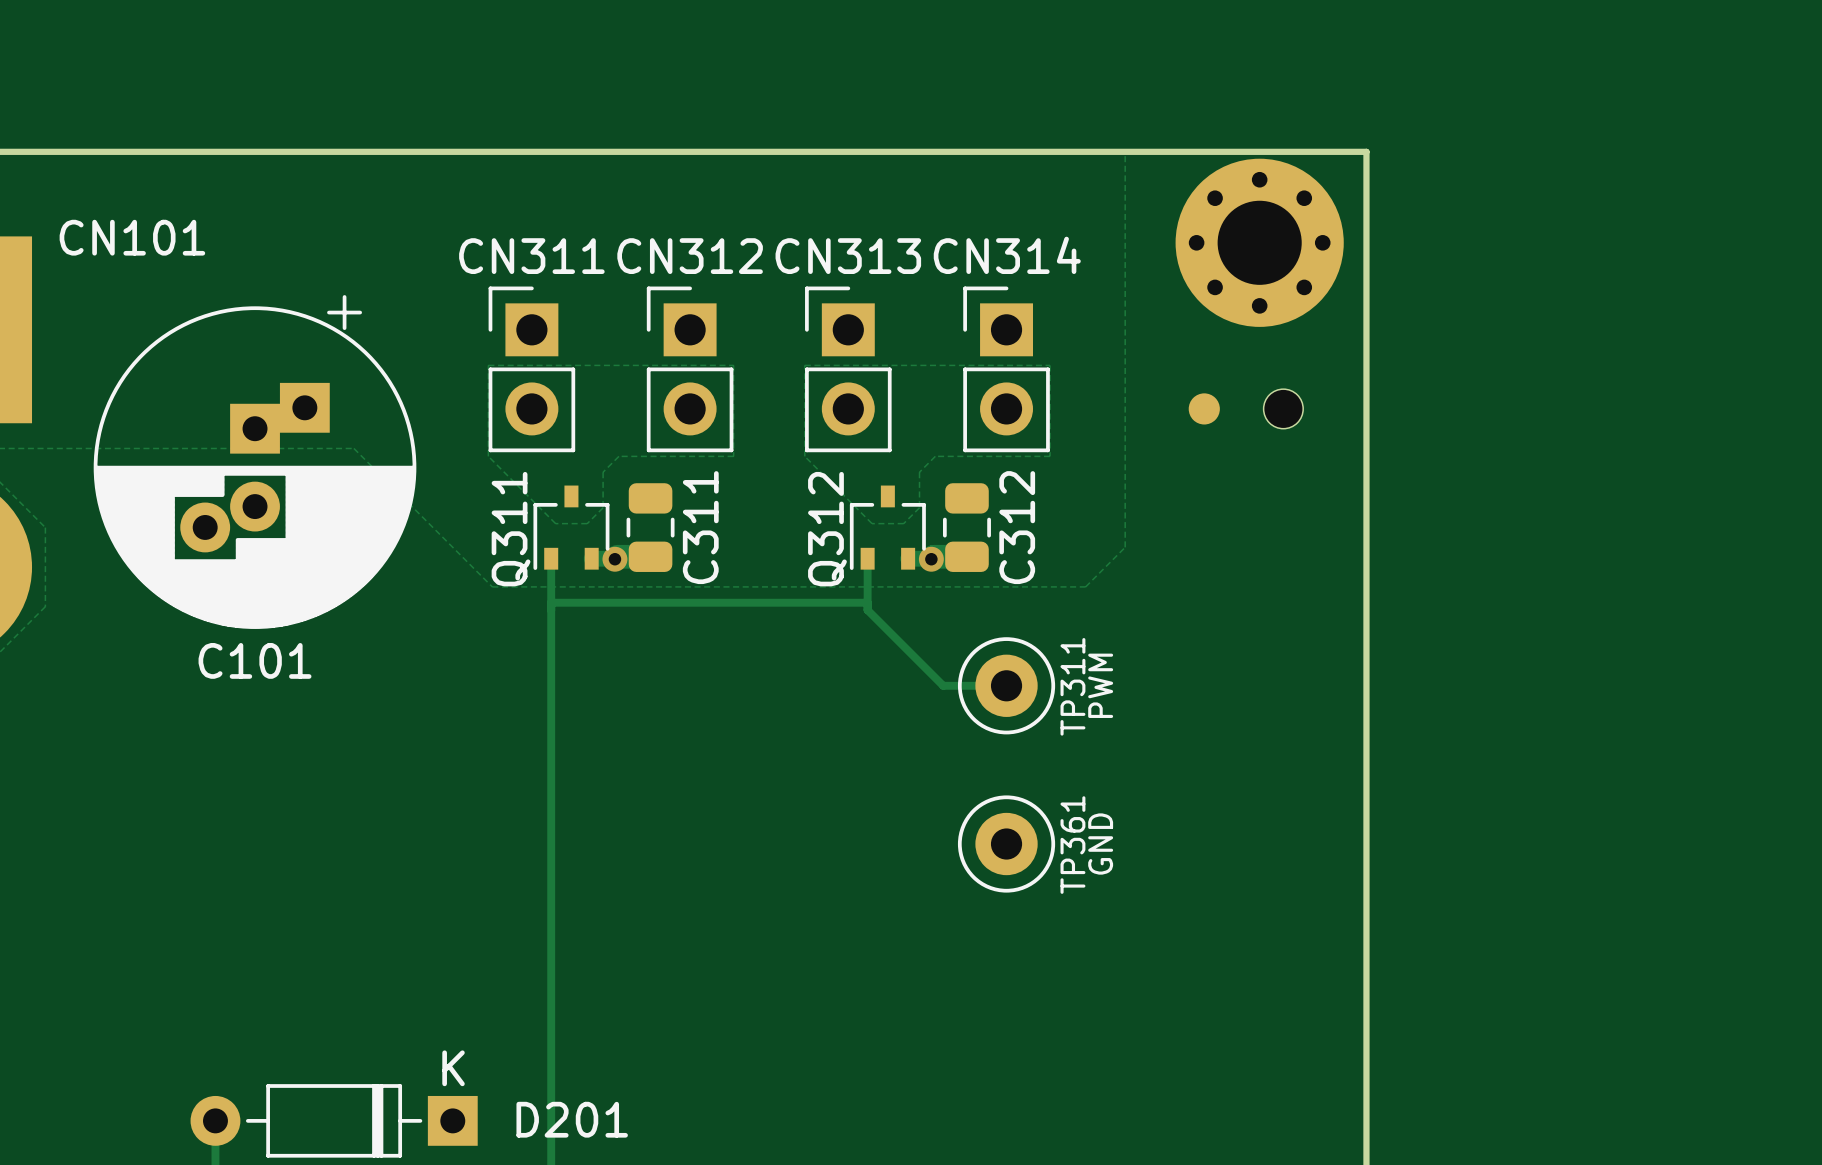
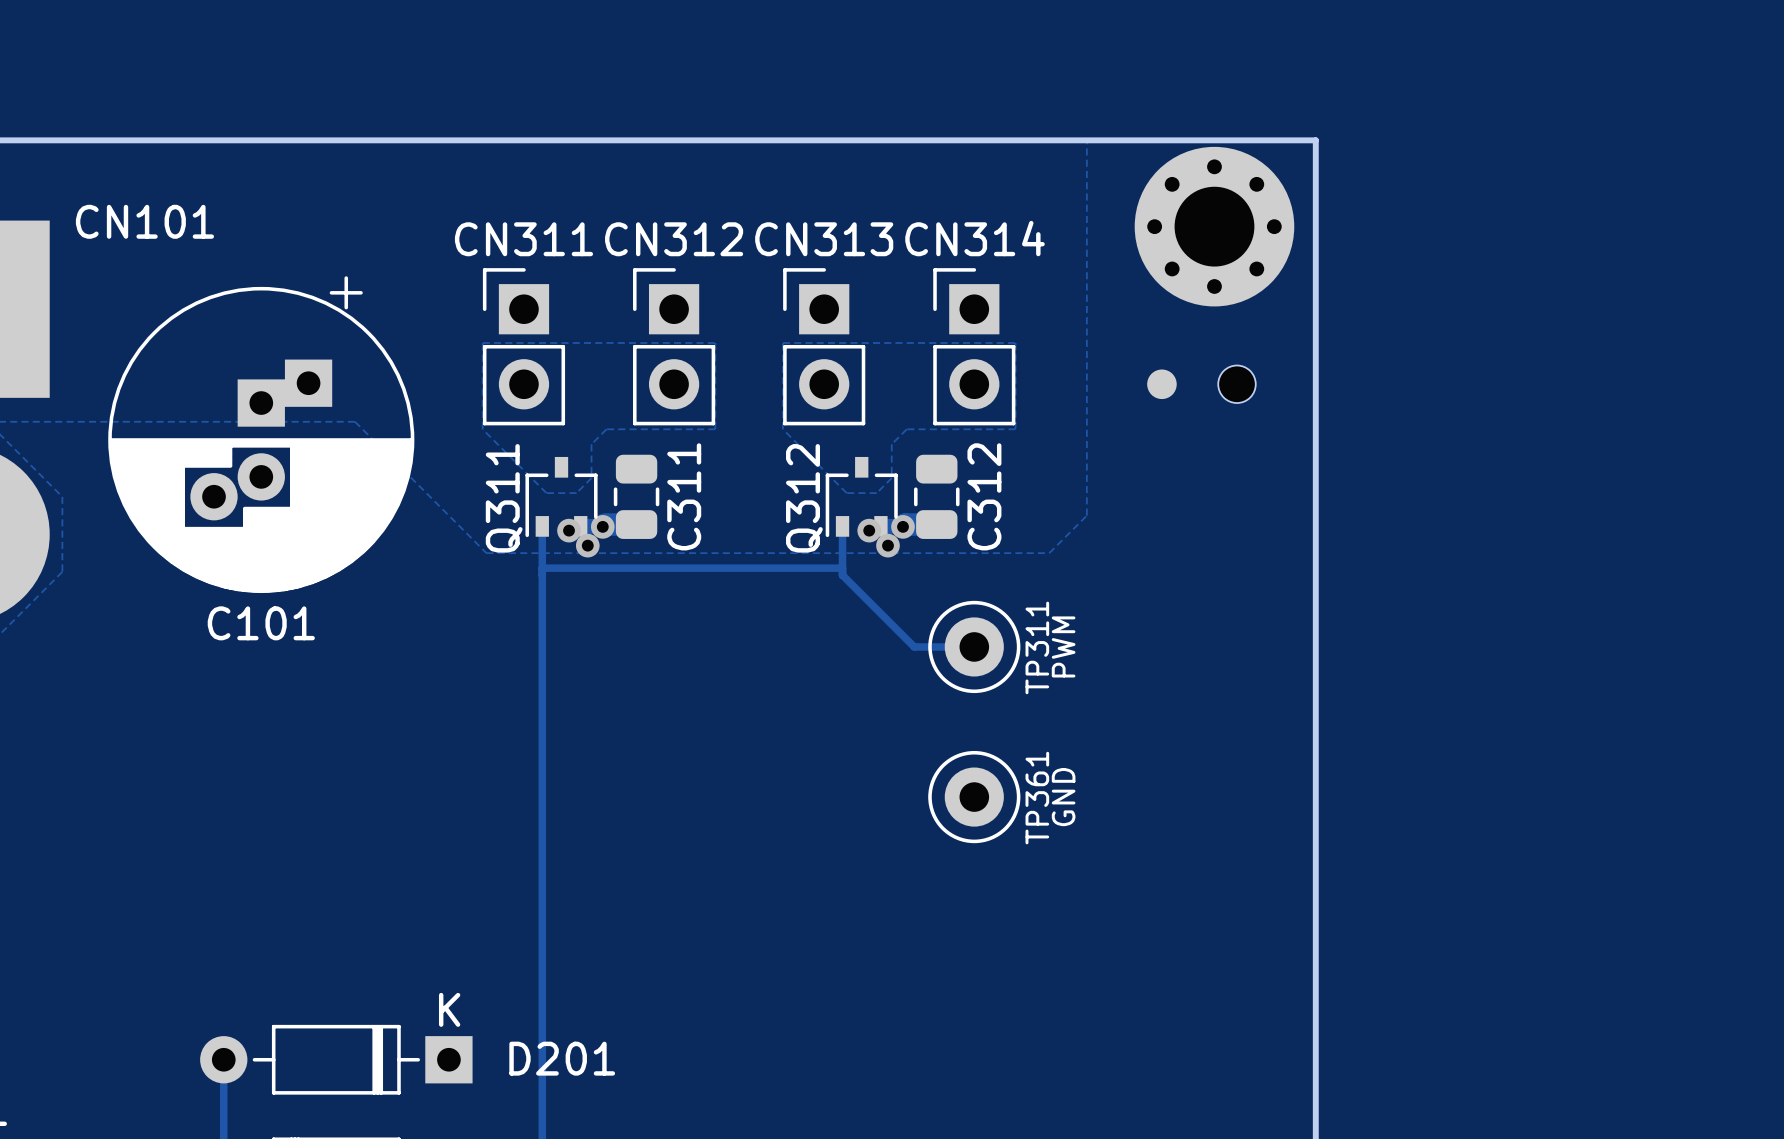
via: none -> (569, 530)
via: none -> (869, 530)
via: none -> (587, 545)
via: none -> (887, 545)

